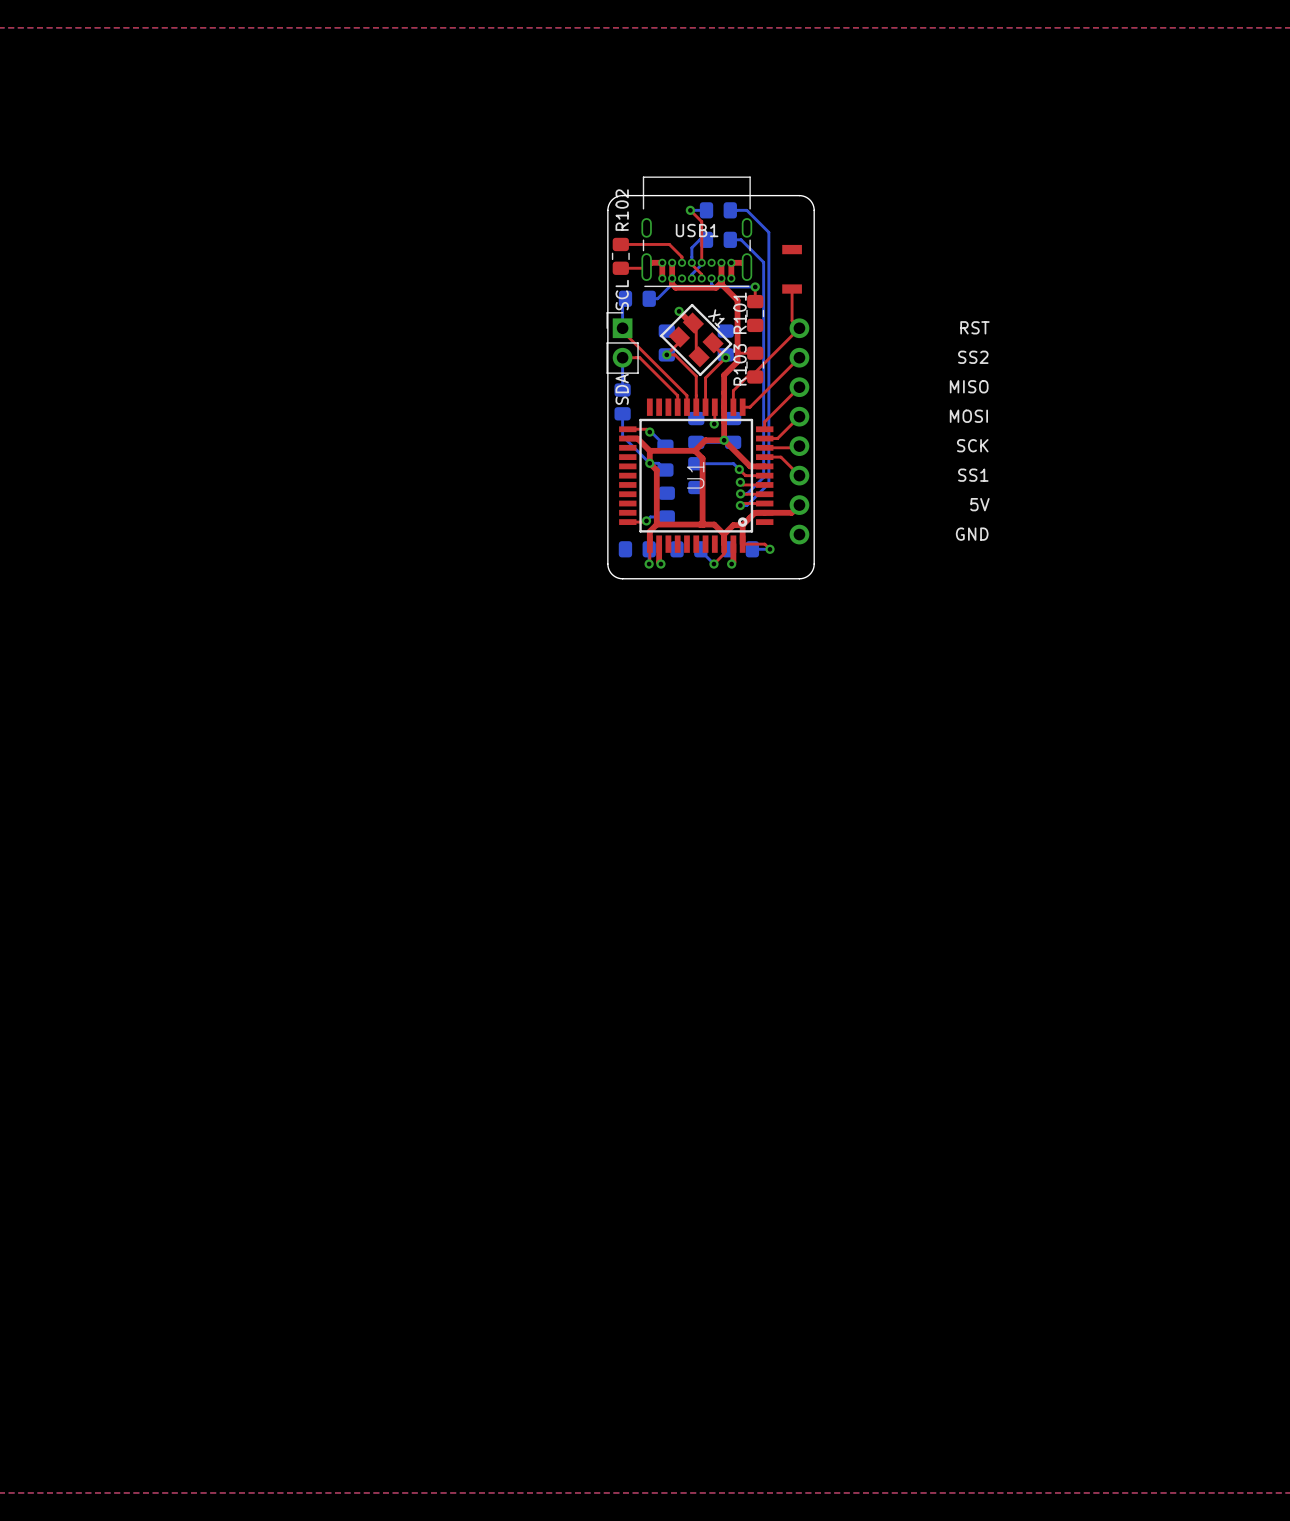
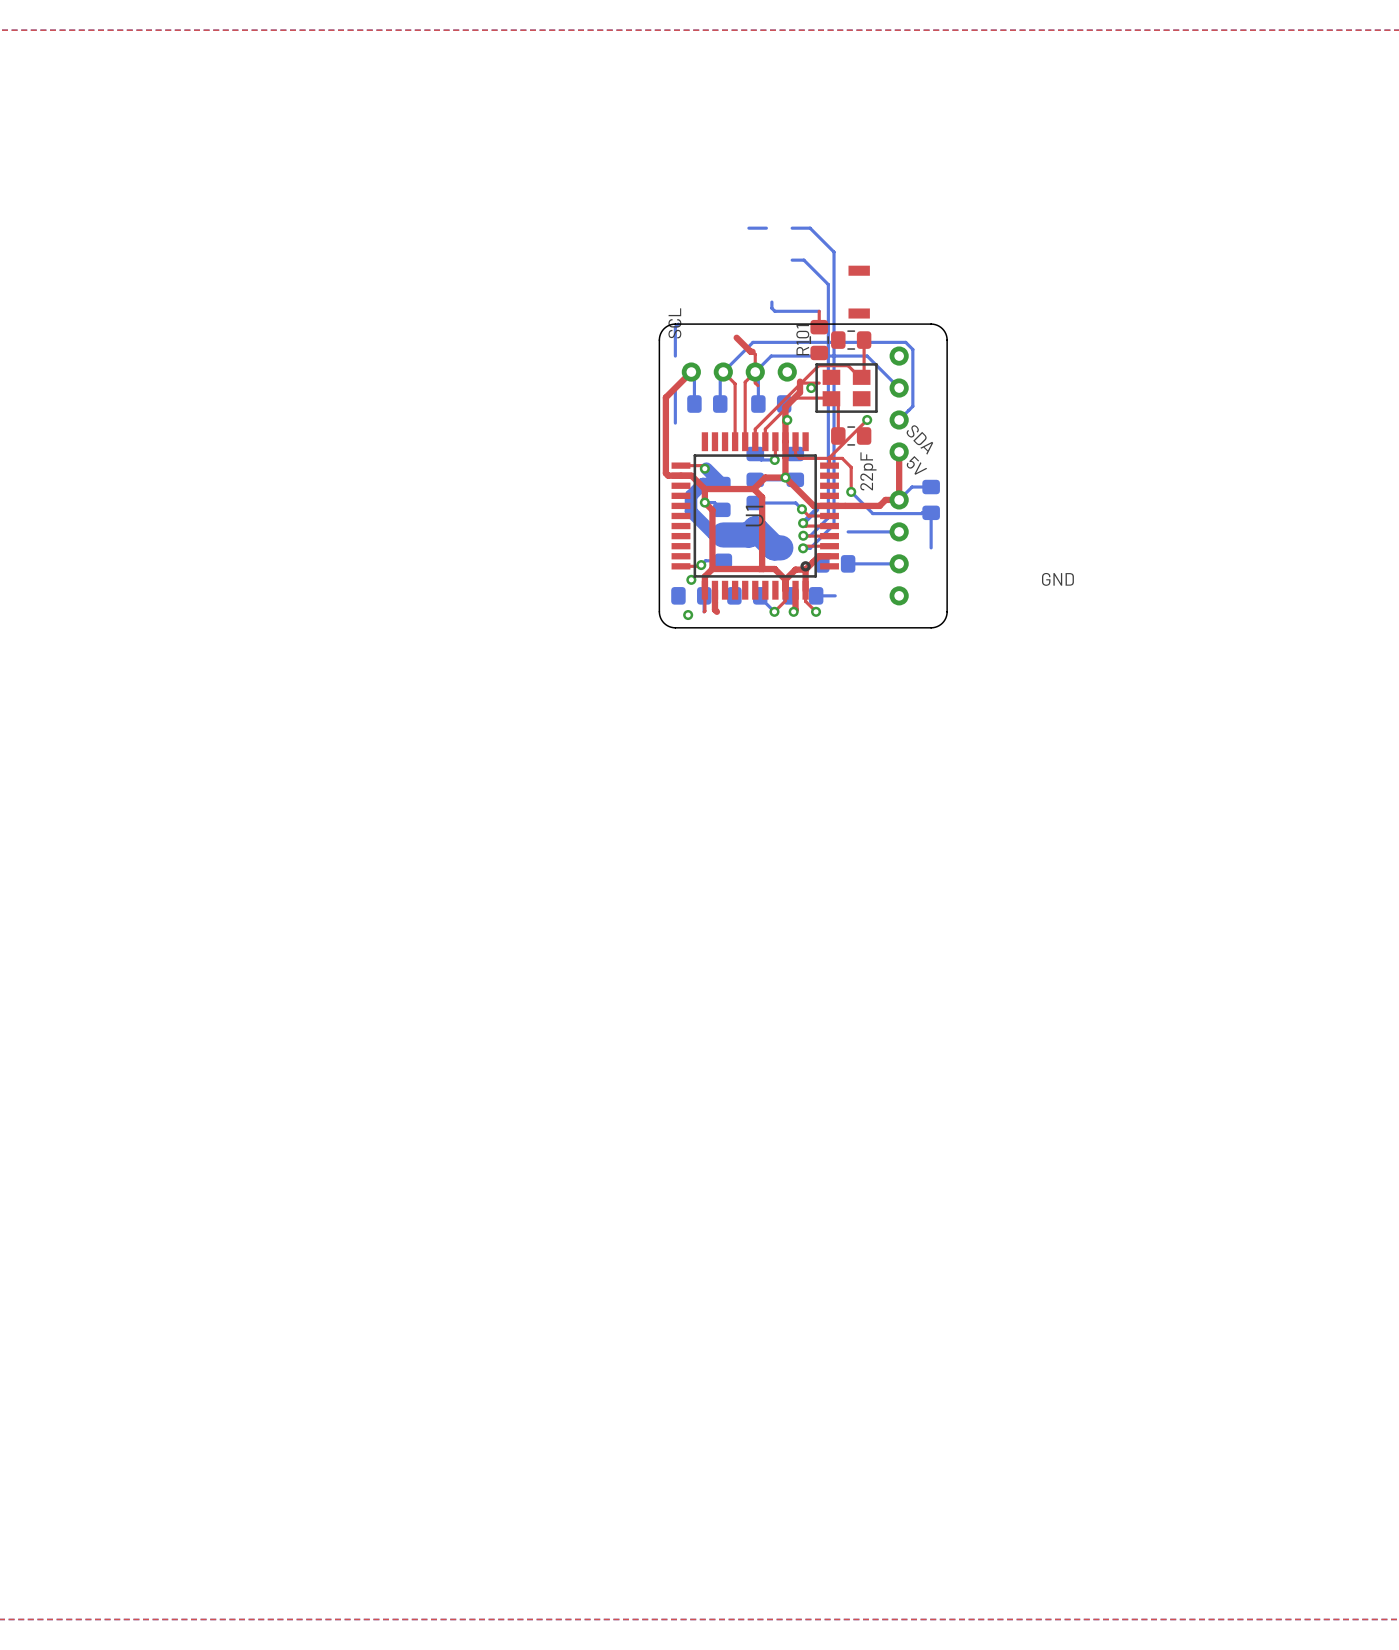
top track: (690, 210) (701, 221) (701, 262) -> none
via: (690, 210) -> none
part: (718, 210) -> none
USB1: (696, 231) -> none
bottom track: (706, 239) (699, 239) (691, 247) (691, 262) -> none
part: (718, 239) -> none
top track: (620, 244) (669, 244) (682, 257) (682, 262) -> none
R102: (620, 256) -> none
top track: (672, 262) (672, 284) (675, 287) (716, 287) (721, 282) -> none
top track: (691, 262) (701, 274) (701, 278) -> none
bottom track: (701, 262) (691, 274) (691, 278) -> none
top track: (721, 262) (721, 284) (737, 300) (737, 351) -> none
top track: (746, 267) (742, 262) (731, 262) (731, 278) -> none
top track: (620, 268) (645, 268) (650, 262) (662, 262) (662, 278) -> none
bottom track: (673, 280) (672, 278) (672, 284) (657, 298) (649, 298) -> none
via: (755, 286) -> none
top track: (792, 289) (792, 320) (799, 328) (755, 372) (755, 376) (747, 376) (733, 390) (733, 407) -> (851, 491) (851, 467) (842, 458) (799, 458) (795, 454) (795, 441)
part: (637, 298) -> none
via: (679, 311) -> none
board edge: (607, 313) (607, 210) (609, 202) (615, 197) (622, 195) (799, 195) (811, 201) (814, 210) (814, 564) (809, 574) (799, 578) -> (659, 340) (664, 328) (675, 324) (931, 324) (939, 326) (943, 330) (947, 340) (946, 615) (940, 624) (933, 627) (867, 627)
text: RST (974, 327) -> none
top track: (622, 328) (622, 331) (686, 395) -> (755, 372) (745, 382) (745, 429)
part: (799, 328) -> none
top track: (680, 337) (680, 341) (666, 354) (674, 354) (696, 376) (696, 395) -> (864, 340) (864, 374) (860, 377) (848, 365) (818, 365) (755, 429)
X1: (696, 339) -> none
part: (622, 342) -> none
top track: none -> (691, 372) (665, 397) (665, 473) (668, 475) (680, 475)
bottom track: none -> (691, 372) (694, 375) (694, 404)
part side: bottom (666, 342) -> top (851, 340)
part: none -> (739, 372)
top track: (711, 342) (725, 357) (705, 377) (705, 395) -> (838, 435) (838, 403) (832, 398) (796, 398) (765, 429)
part side: bottom (725, 342) -> top (851, 435)
via: (666, 354) -> none
top track: (622, 357) (639, 357) (677, 395) -> (723, 372) (735, 383) (735, 429)
via: (725, 357) -> none
via: none -> (811, 388)
part: none -> (846, 388)
top track: (799, 357) (749, 407) (742, 407) -> none
part: (799, 357) -> none
bottom track: none -> (899, 388) (867, 356) (771, 356) (755, 372) (758, 375) (758, 404)
text: SS2 (973, 357) -> none
R103 side: top (755, 365) -> bottom (931, 499)
part: none -> (707, 404)
bottom track: none -> (720, 404) (720, 375) (752, 342) (905, 342) (912, 349) (912, 406) (899, 420)
part: none -> (771, 404)
part: none -> (899, 404)
text: MISO (969, 386) -> none
via: none -> (787, 420)
part: (799, 387) -> none
via: none -> (867, 420)
text rotation: 0° (622, 389) -> 135° clockwise (919, 439)
text position: SDA (622, 389) -> SDA (919, 439)
part: (622, 401) -> none
bottom track: (622, 413) (622, 436) (649, 463) -> none
top track: (799, 416) (777, 438) (764, 438) -> none
part: (799, 416) -> none
top track: none -> (899, 451) (899, 499) (885, 499) (879, 505) (829, 505)
text: MOSI (968, 416) -> none
bottom track: none -> (755, 454) (761, 459) (771, 459)
bottom track: none -> (706, 468) (721, 484) (702, 484) (691, 495) (691, 511) (714, 534) (749, 534) (755, 528) (774, 547) (780, 547)
text: none -> 22pF (868, 471)
text: SCK (972, 445) -> none
top track: (799, 446) (797, 447) (764, 447) -> none
part: (799, 446) -> none
bottom track: none -> (931, 487) (912, 487) (899, 499)
bottom track: none -> (851, 491) (872, 513) (931, 512) (931, 547)
via: none -> (851, 491)
top track: (764, 457) (780, 457) (799, 475) -> none
bottom track: none -> (816, 509) (803, 523)
part: (799, 475) -> none
text: SS1 (973, 475) -> none
bottom track: none -> (848, 531) (899, 531)
text rotation: 0° (979, 504) -> 45° clockwise (916, 465)
text position: 5V (979, 504) -> 5V (916, 465)
top track: (799, 505) (791, 512) (764, 512) -> none
part: (799, 505) -> none
part: none -> (899, 547)
part: none -> (835, 563)
bottom track: none -> (848, 563) (899, 563)
via: none -> (691, 579)
part: (799, 534) -> none
top track: (742, 544) (764, 544) (769, 549) -> (805, 590) (805, 601) (816, 611)
via position: (769, 549) -> (816, 611)
via: (649, 564) -> none
via: (660, 564) -> none
via: none -> (688, 615)

